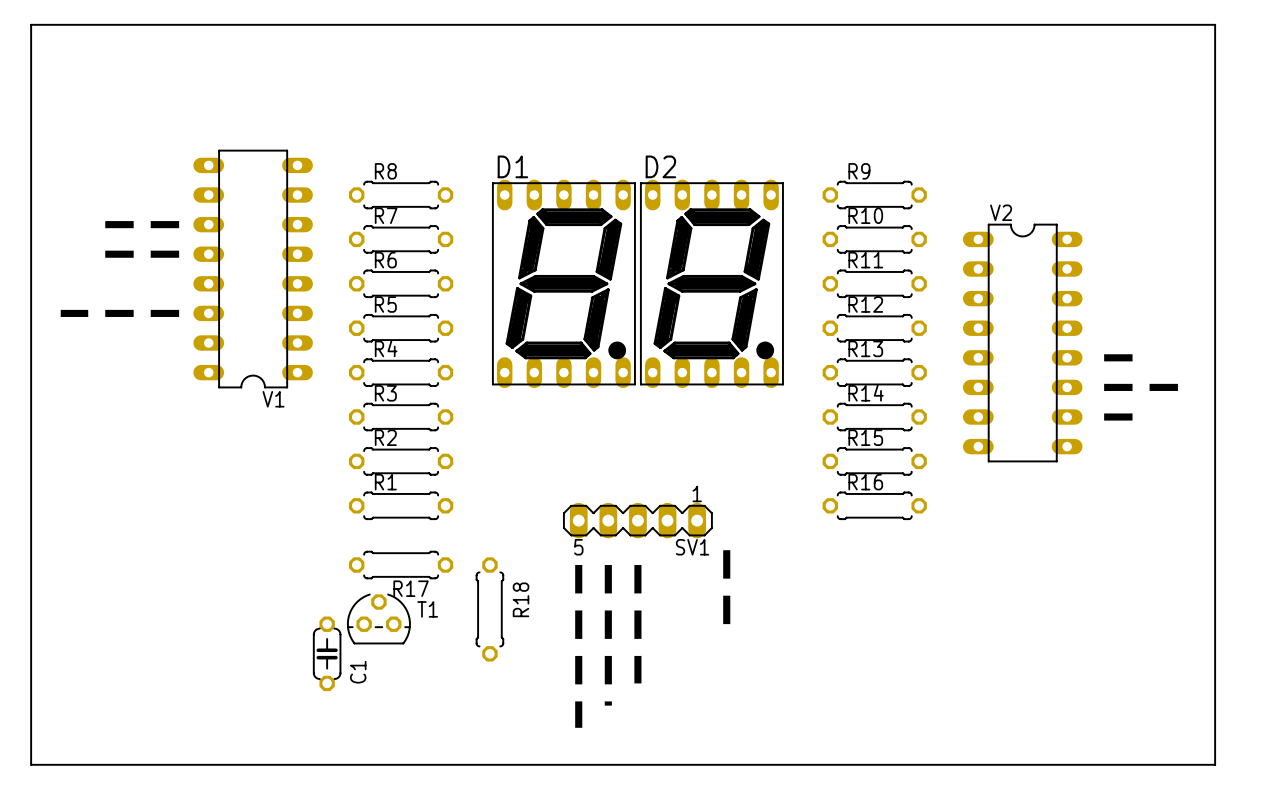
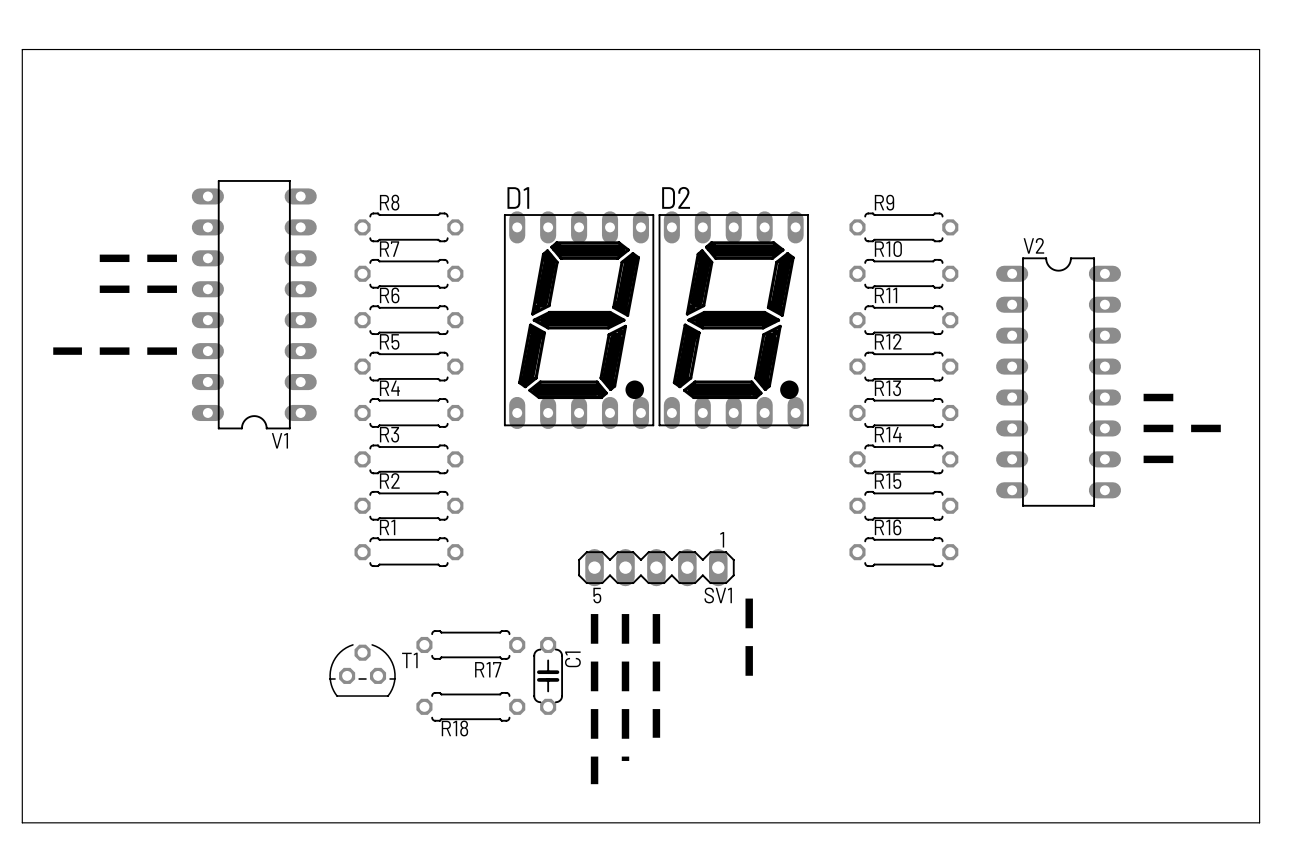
R17 position: (401, 565) -> (470, 644)
T1 footprint: [347, 593, 411, 645] -> [329, 644, 396, 697]
R18 rotation: 0° (489, 609) -> 90° clockwise (470, 706)
C1 position: (327, 653) -> (548, 675)
C1 name position: C1 (358, 672) -> C1 (572, 659)

